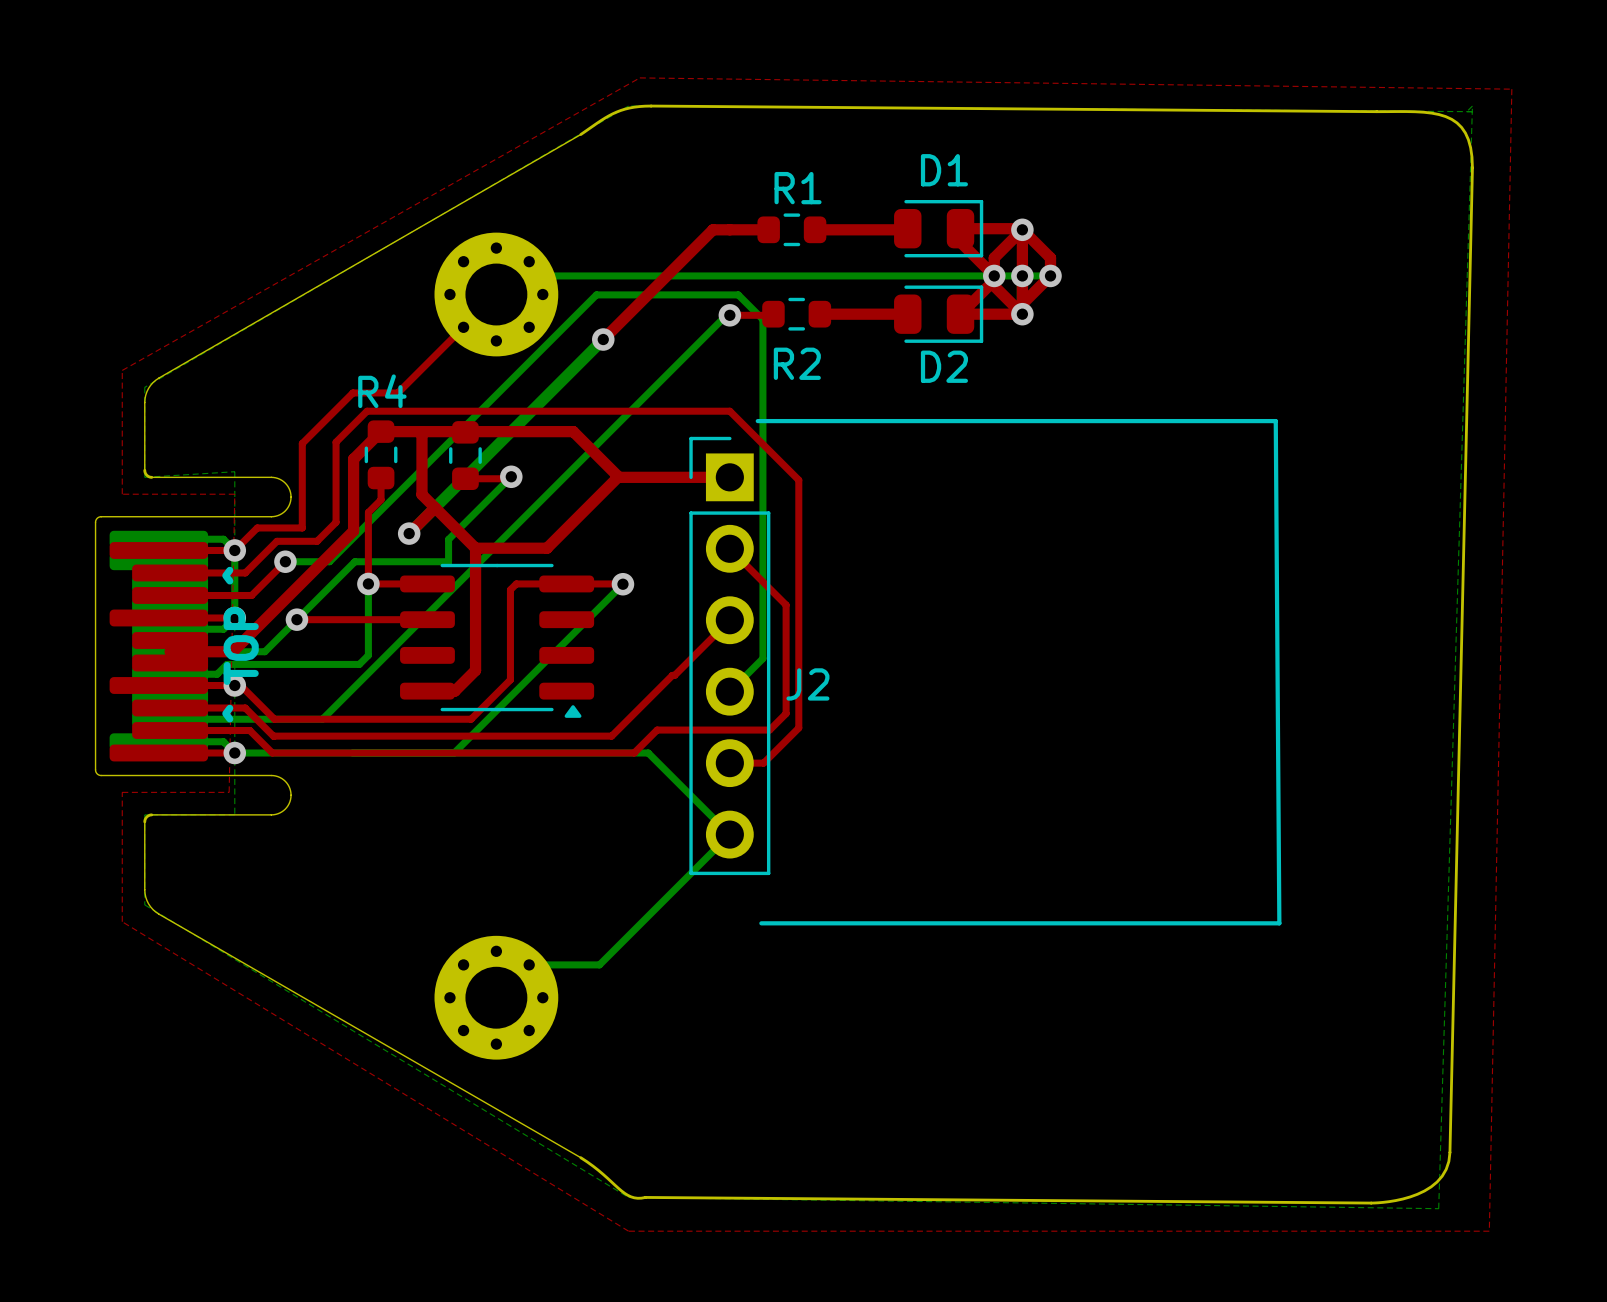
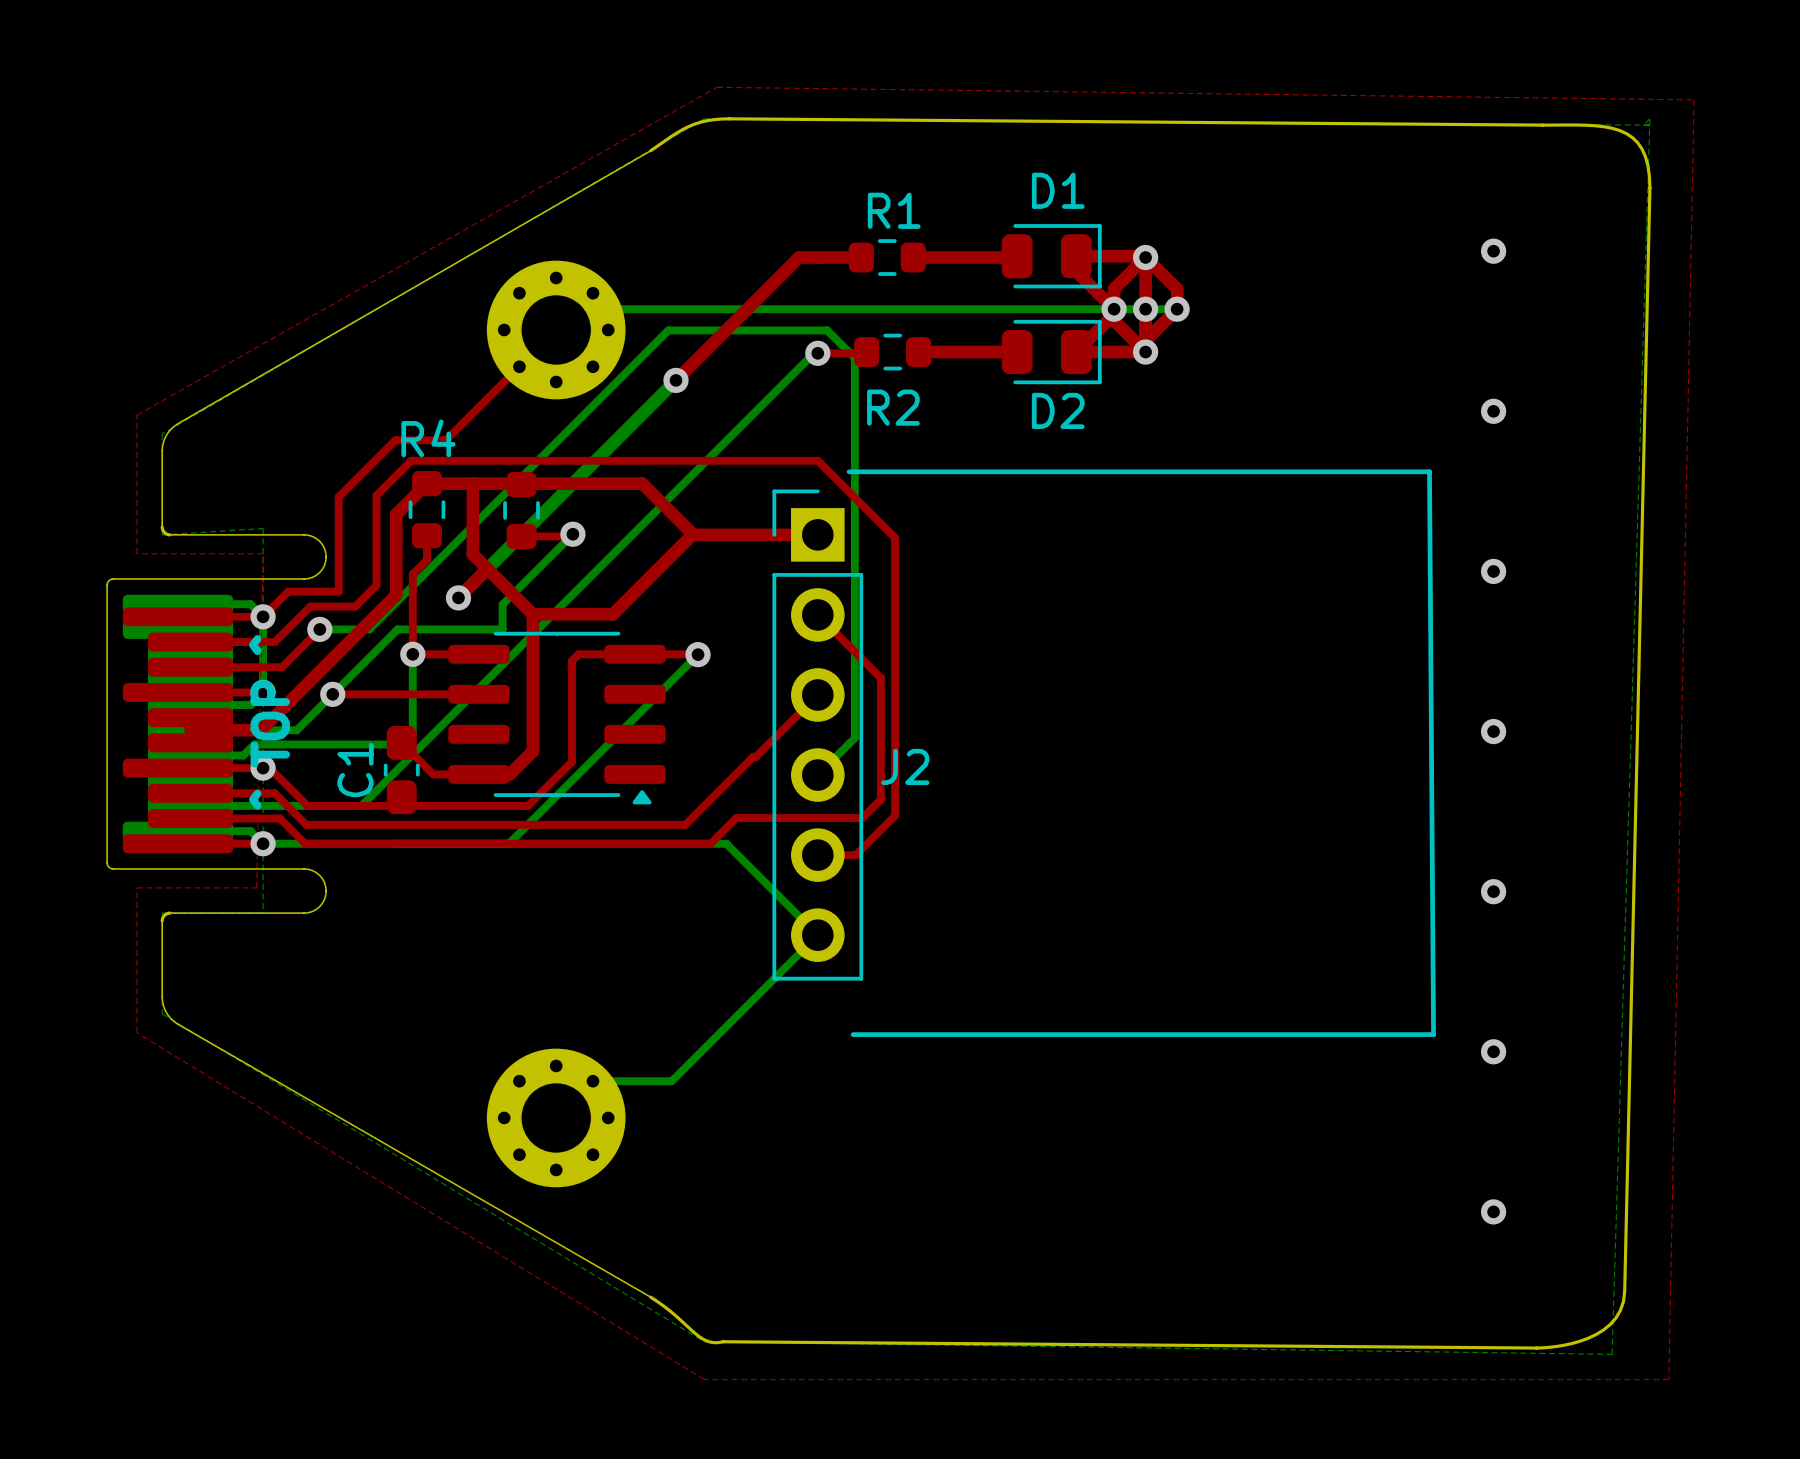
via: none -> (1493, 251)
via: none -> (1493, 411)
via: none -> (1493, 571)
via: none -> (1493, 731)
top track: none -> (401, 742) (433, 774) (478, 774)
C1: none -> (401, 770)
via: none -> (1493, 891)
via: none -> (1493, 1051)
via: none -> (1493, 1211)

